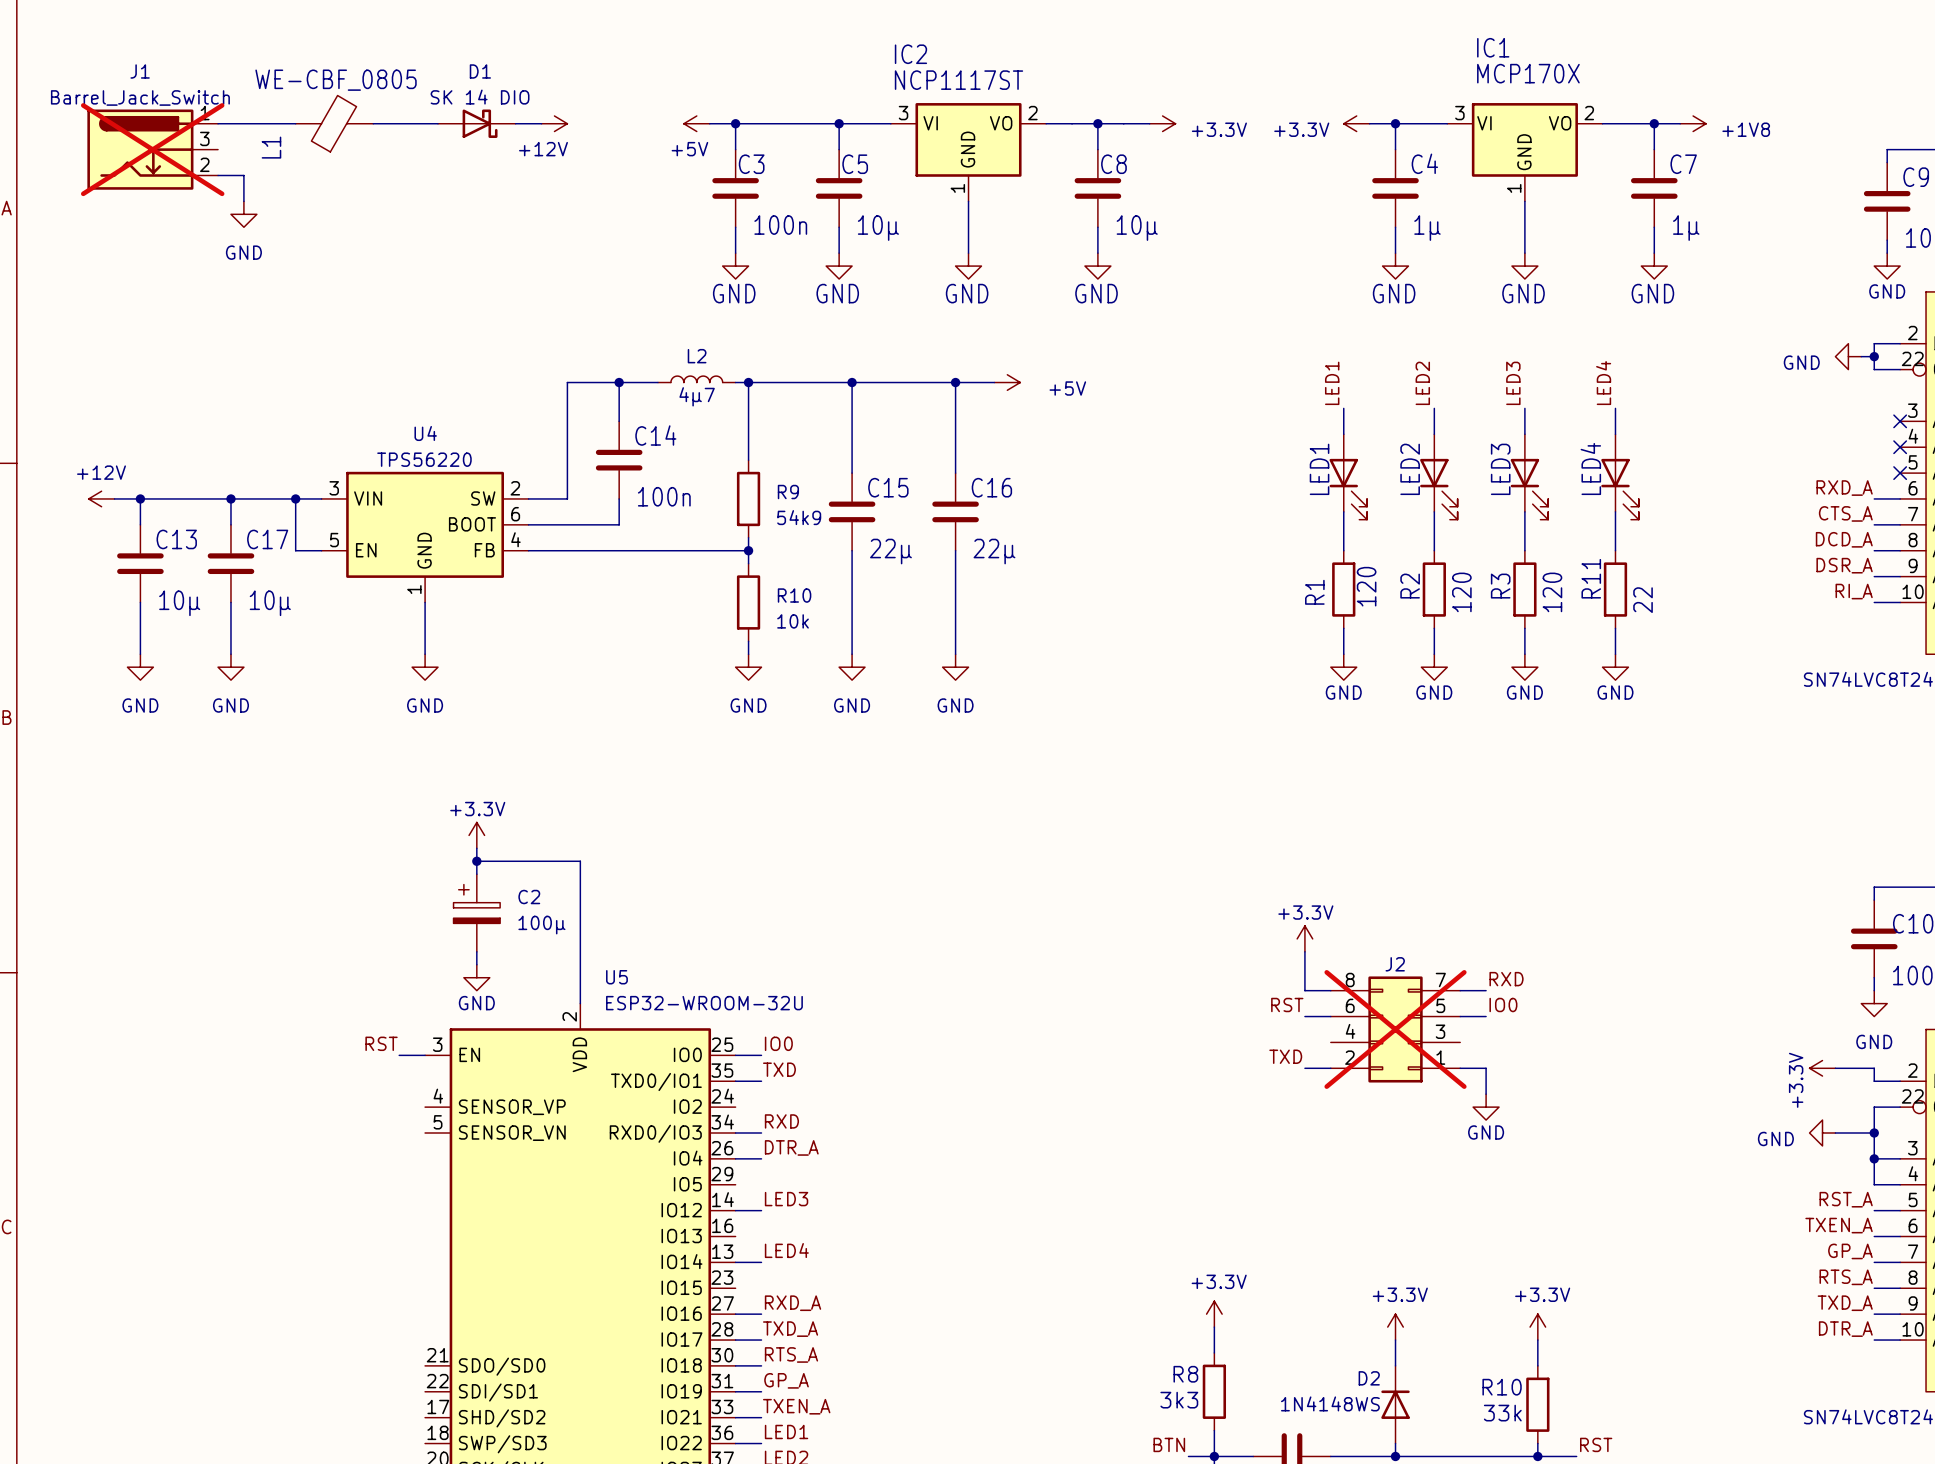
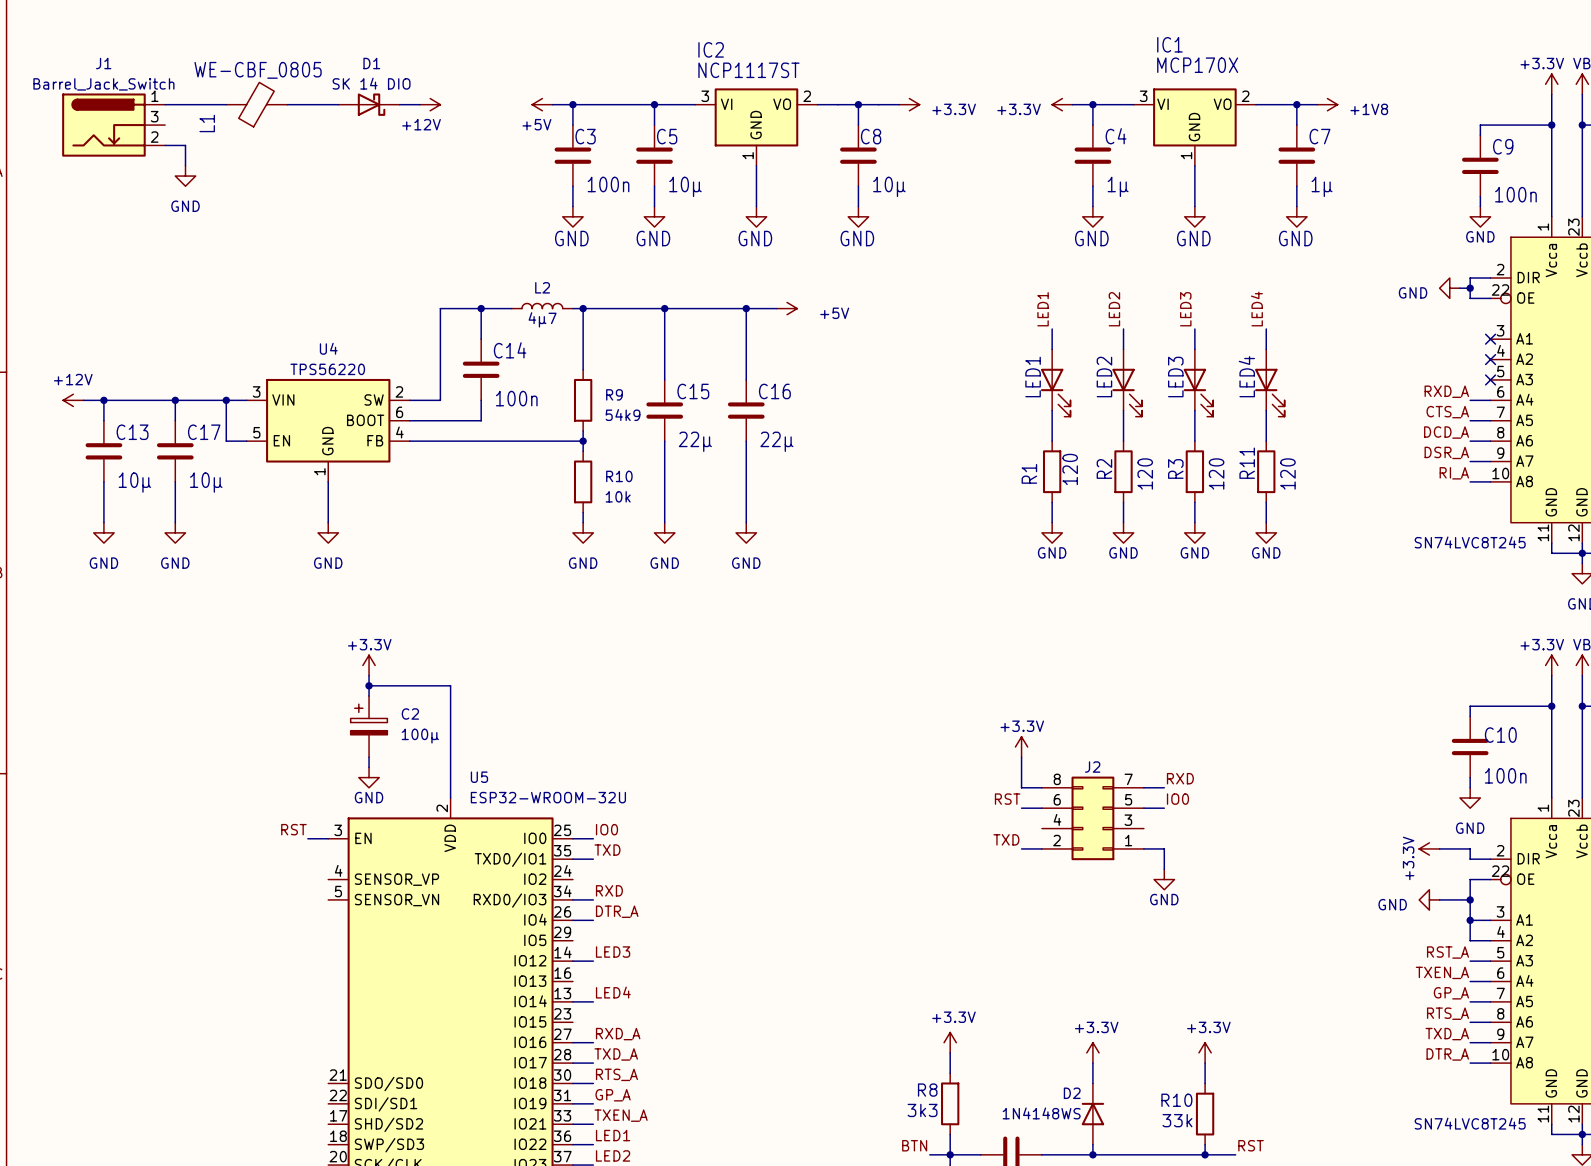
J1 do-not-place cross: (152, 149) -> none
R11 value: 22 (1643, 600) -> 120 (1287, 473)
J2 do-not-place cross: (1395, 1029) -> none

